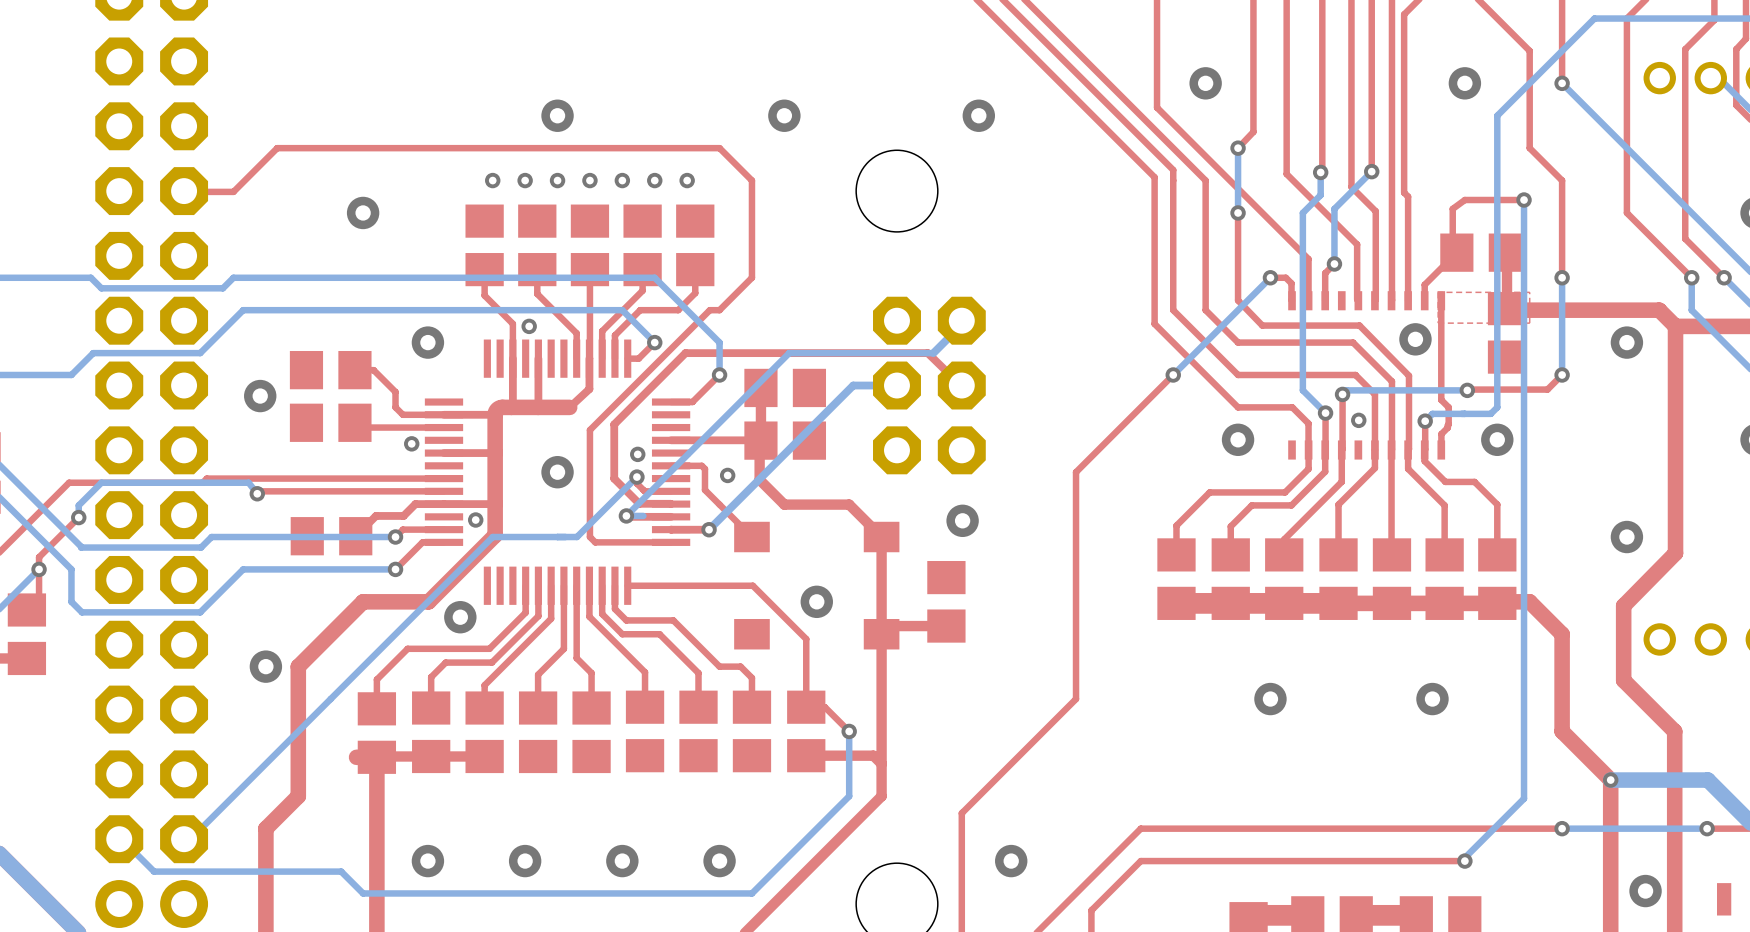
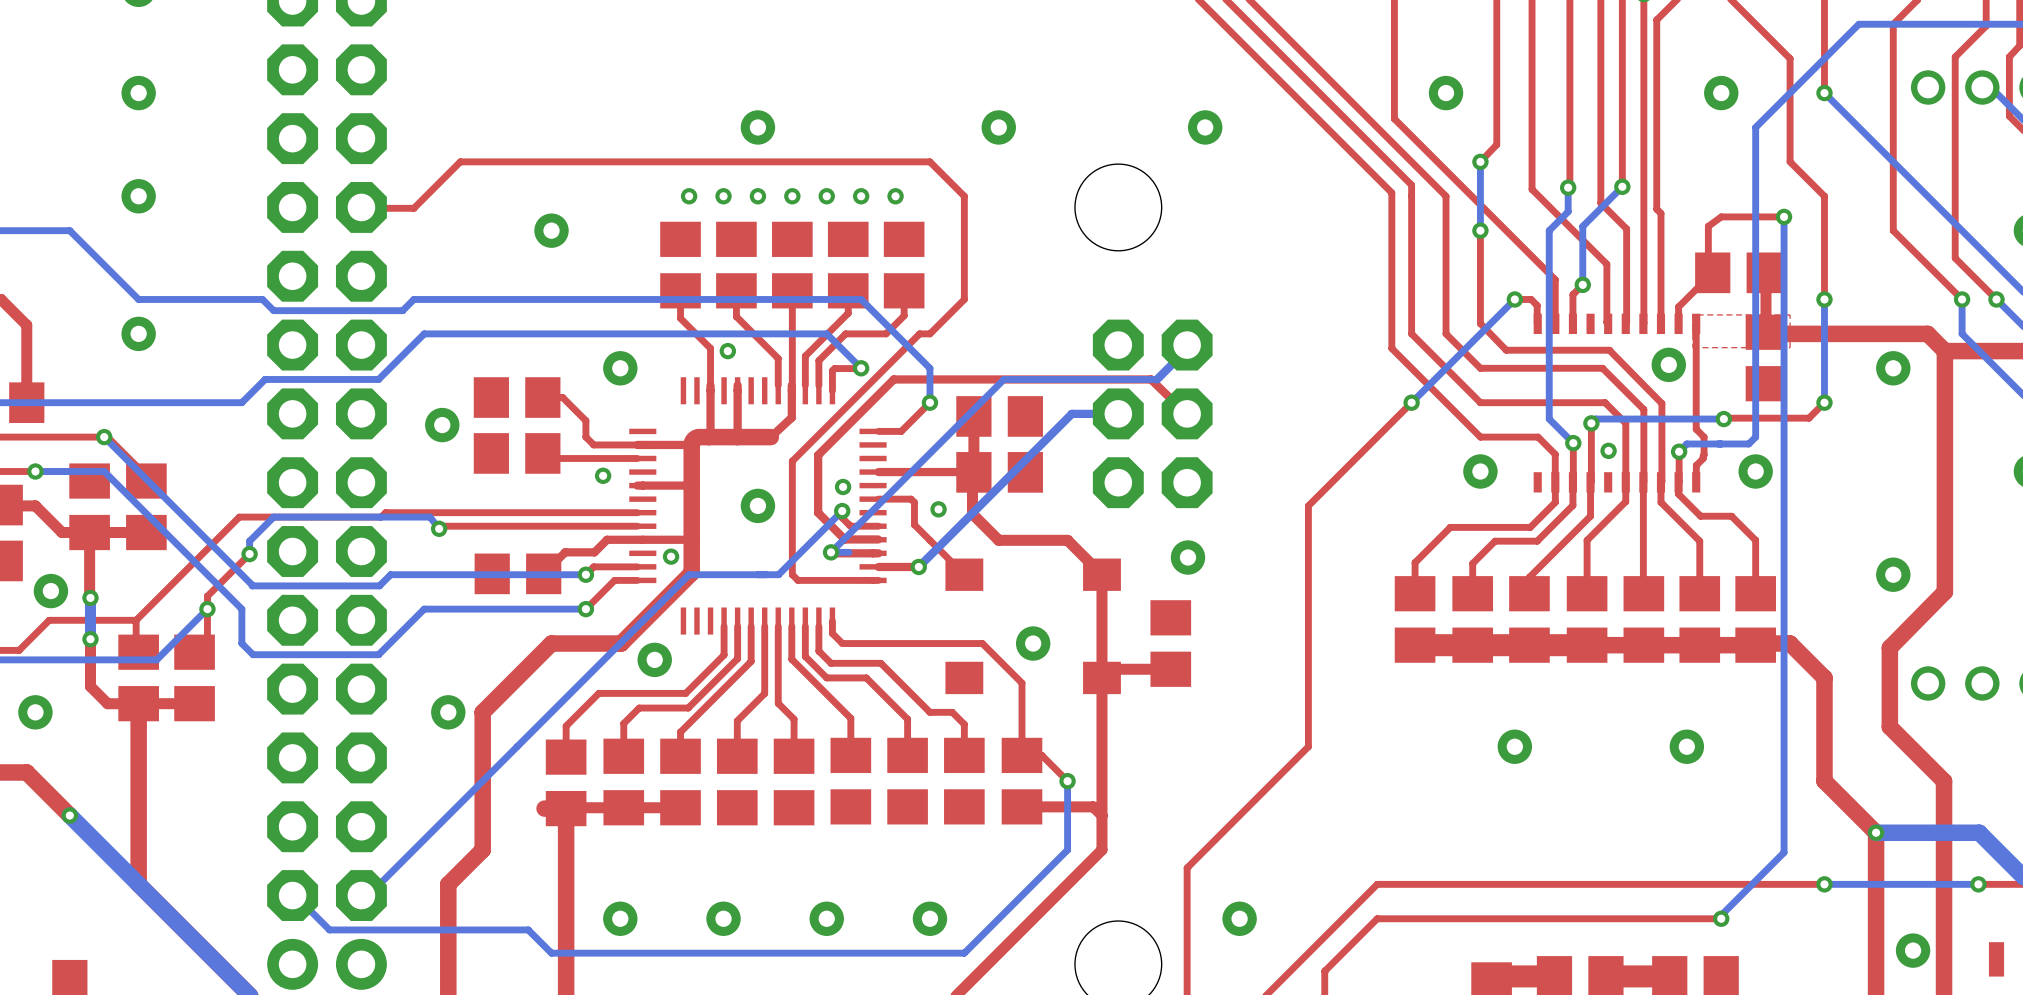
part footprint: [424, 339, 691, 605] -> [629, 377, 887, 635]
top track: (654, 342) (638, 358) (627, 358) -> (860, 368) (834, 368) (832, 370) (832, 390)
top track: (627, 585) (752, 585) (768, 601) -> (832, 621) (832, 633) (842, 643) (982, 643)

